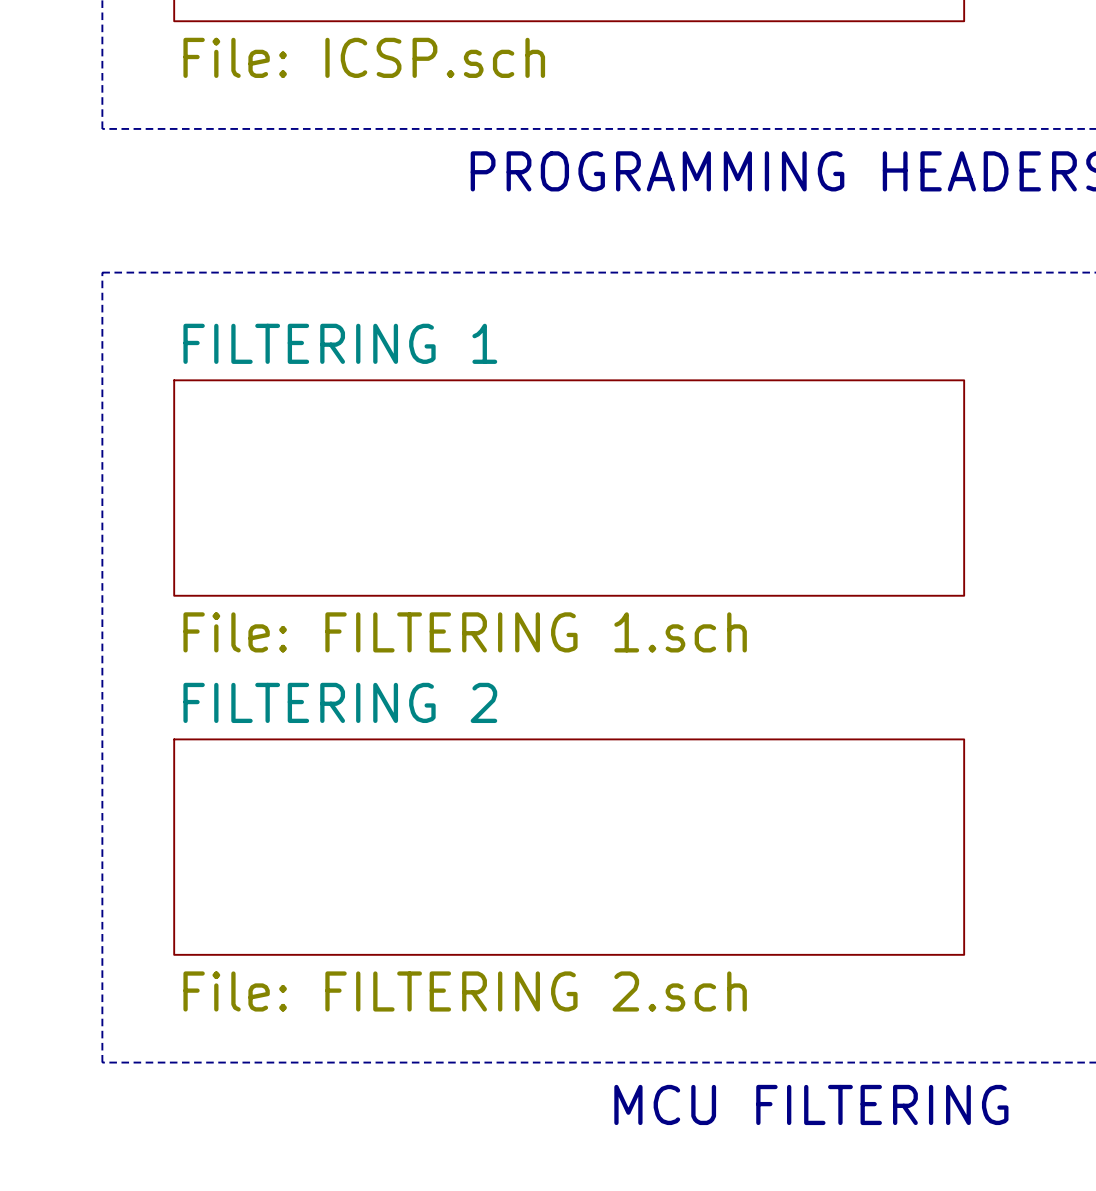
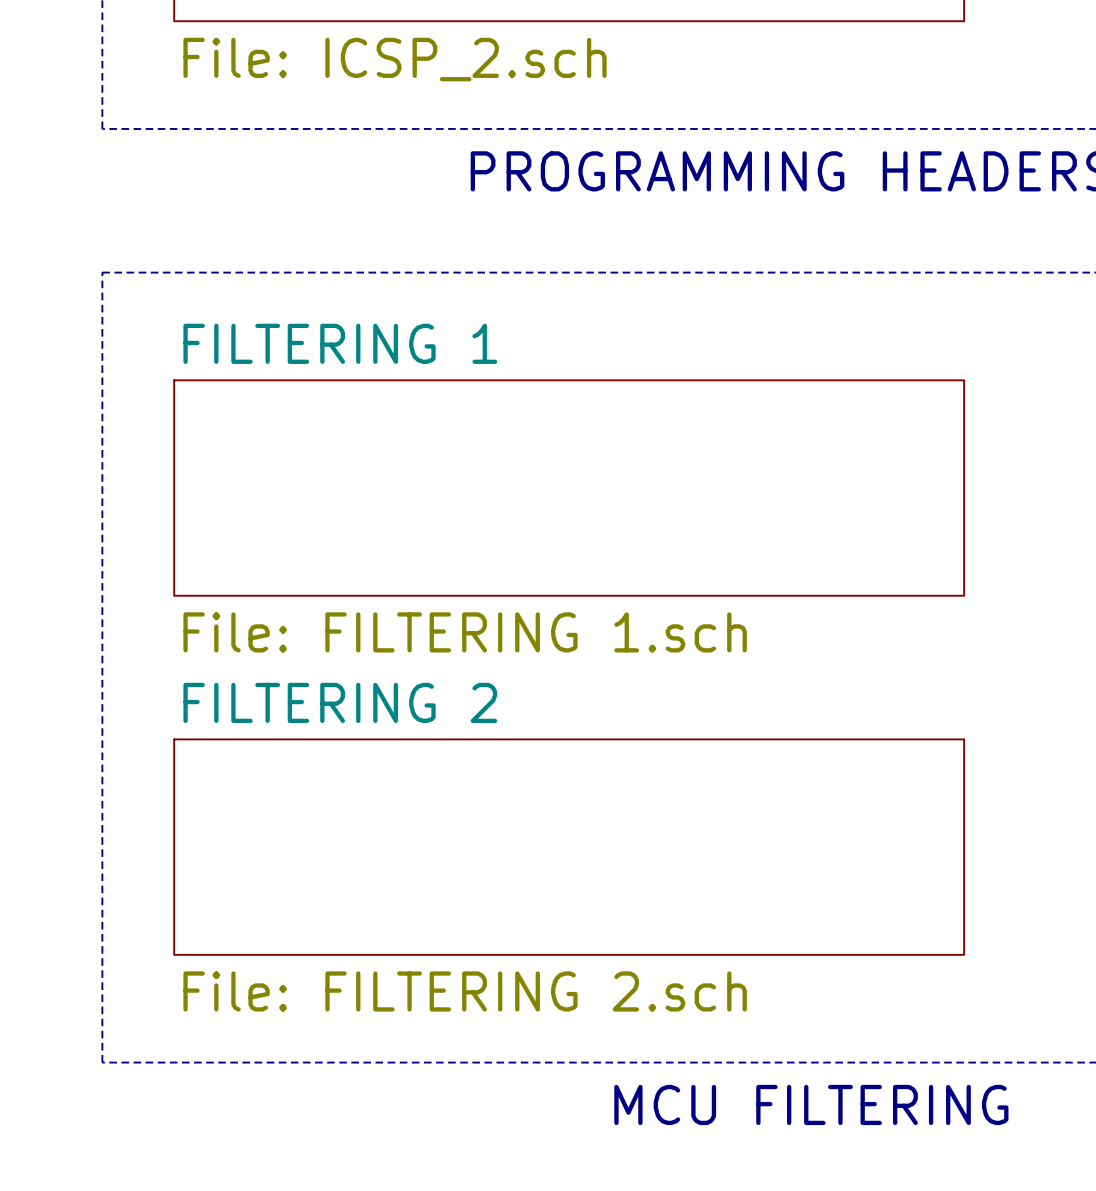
sheet value: File: ICSP.sch (364, 57) -> File: ICSP_2.sch (395, 59)

